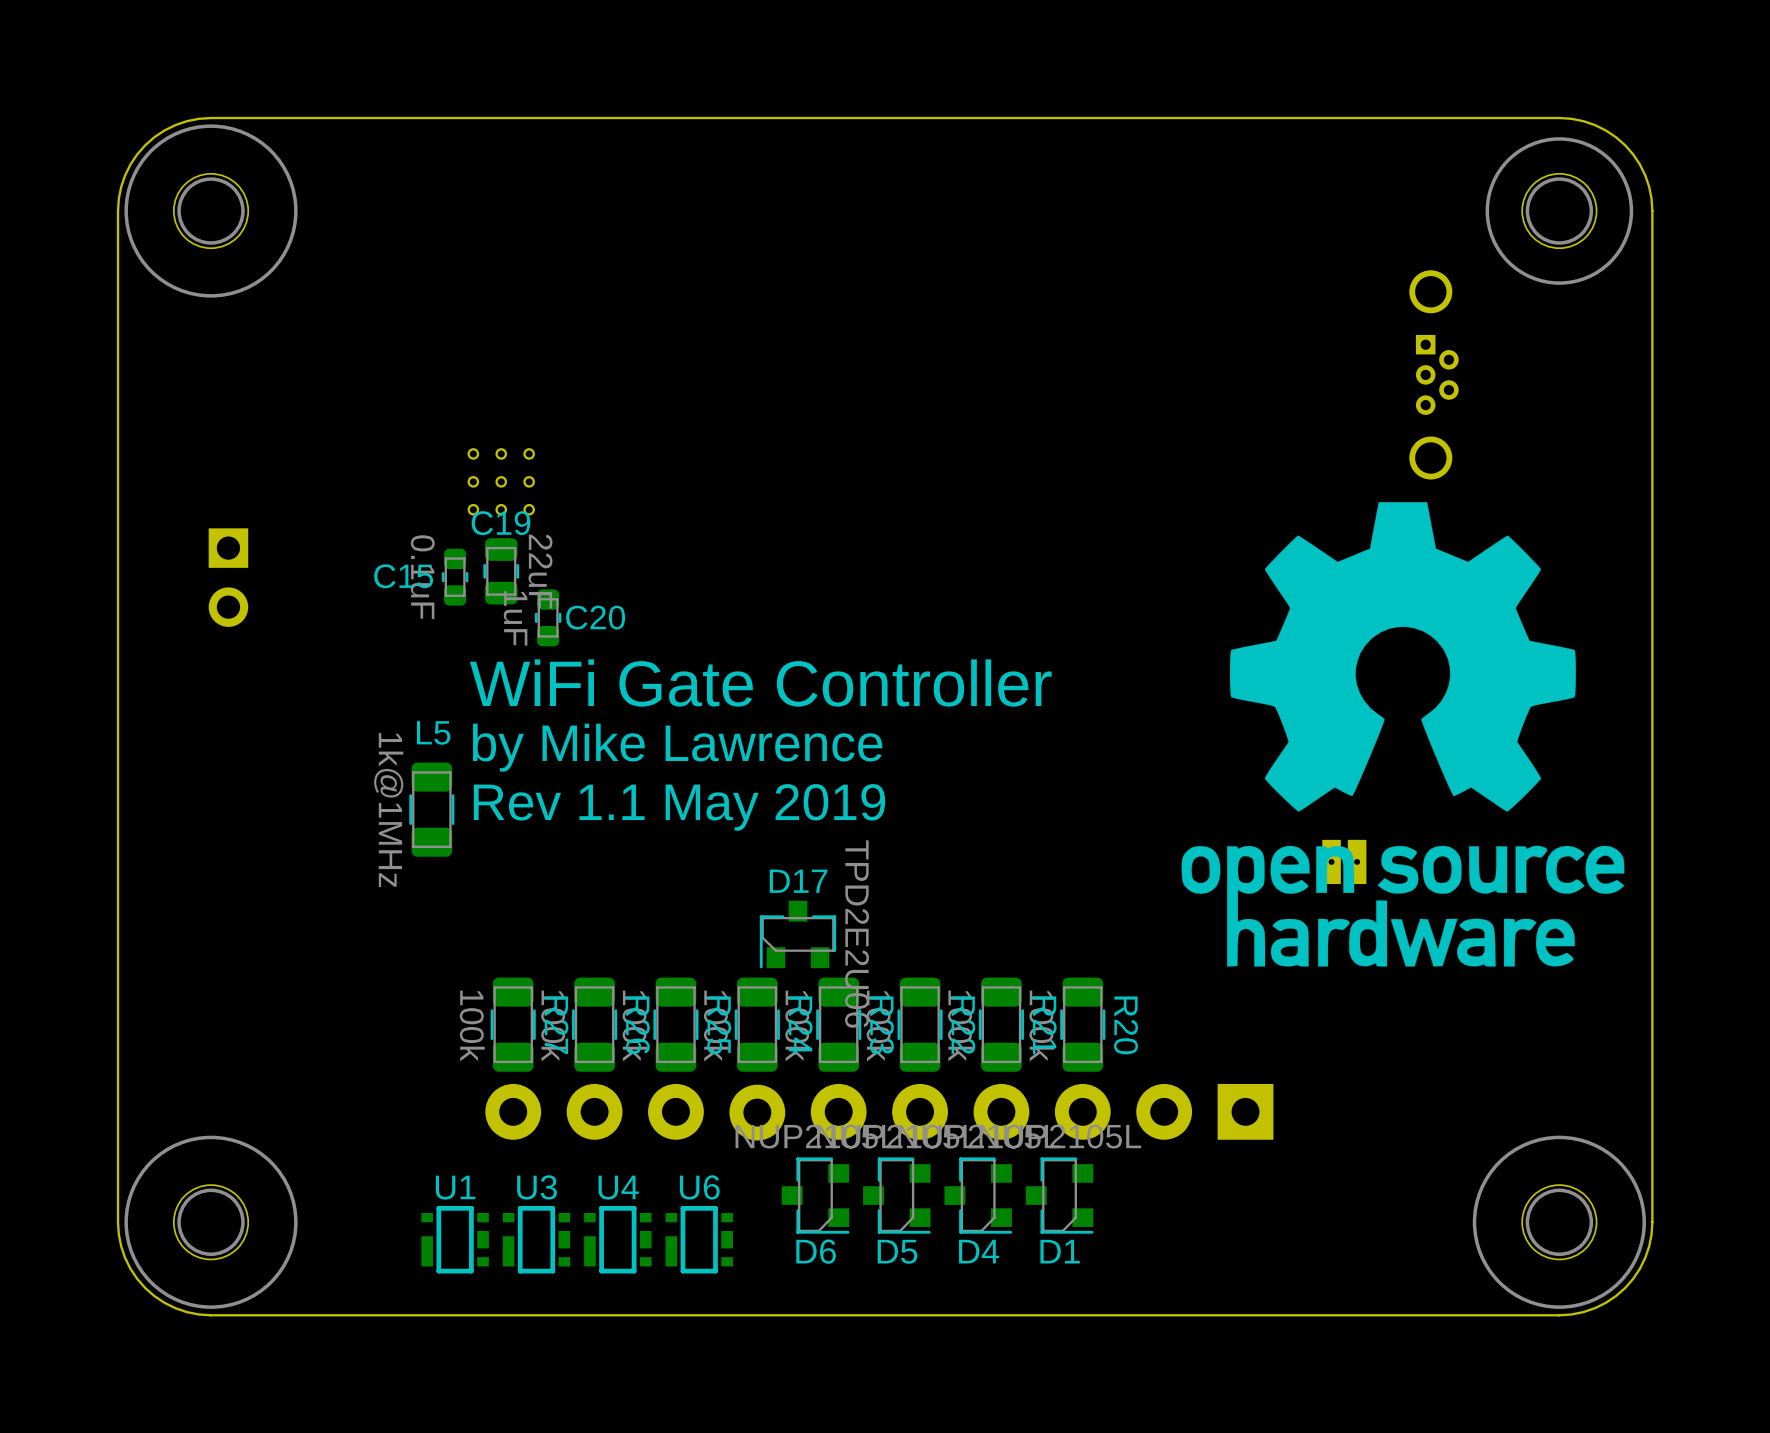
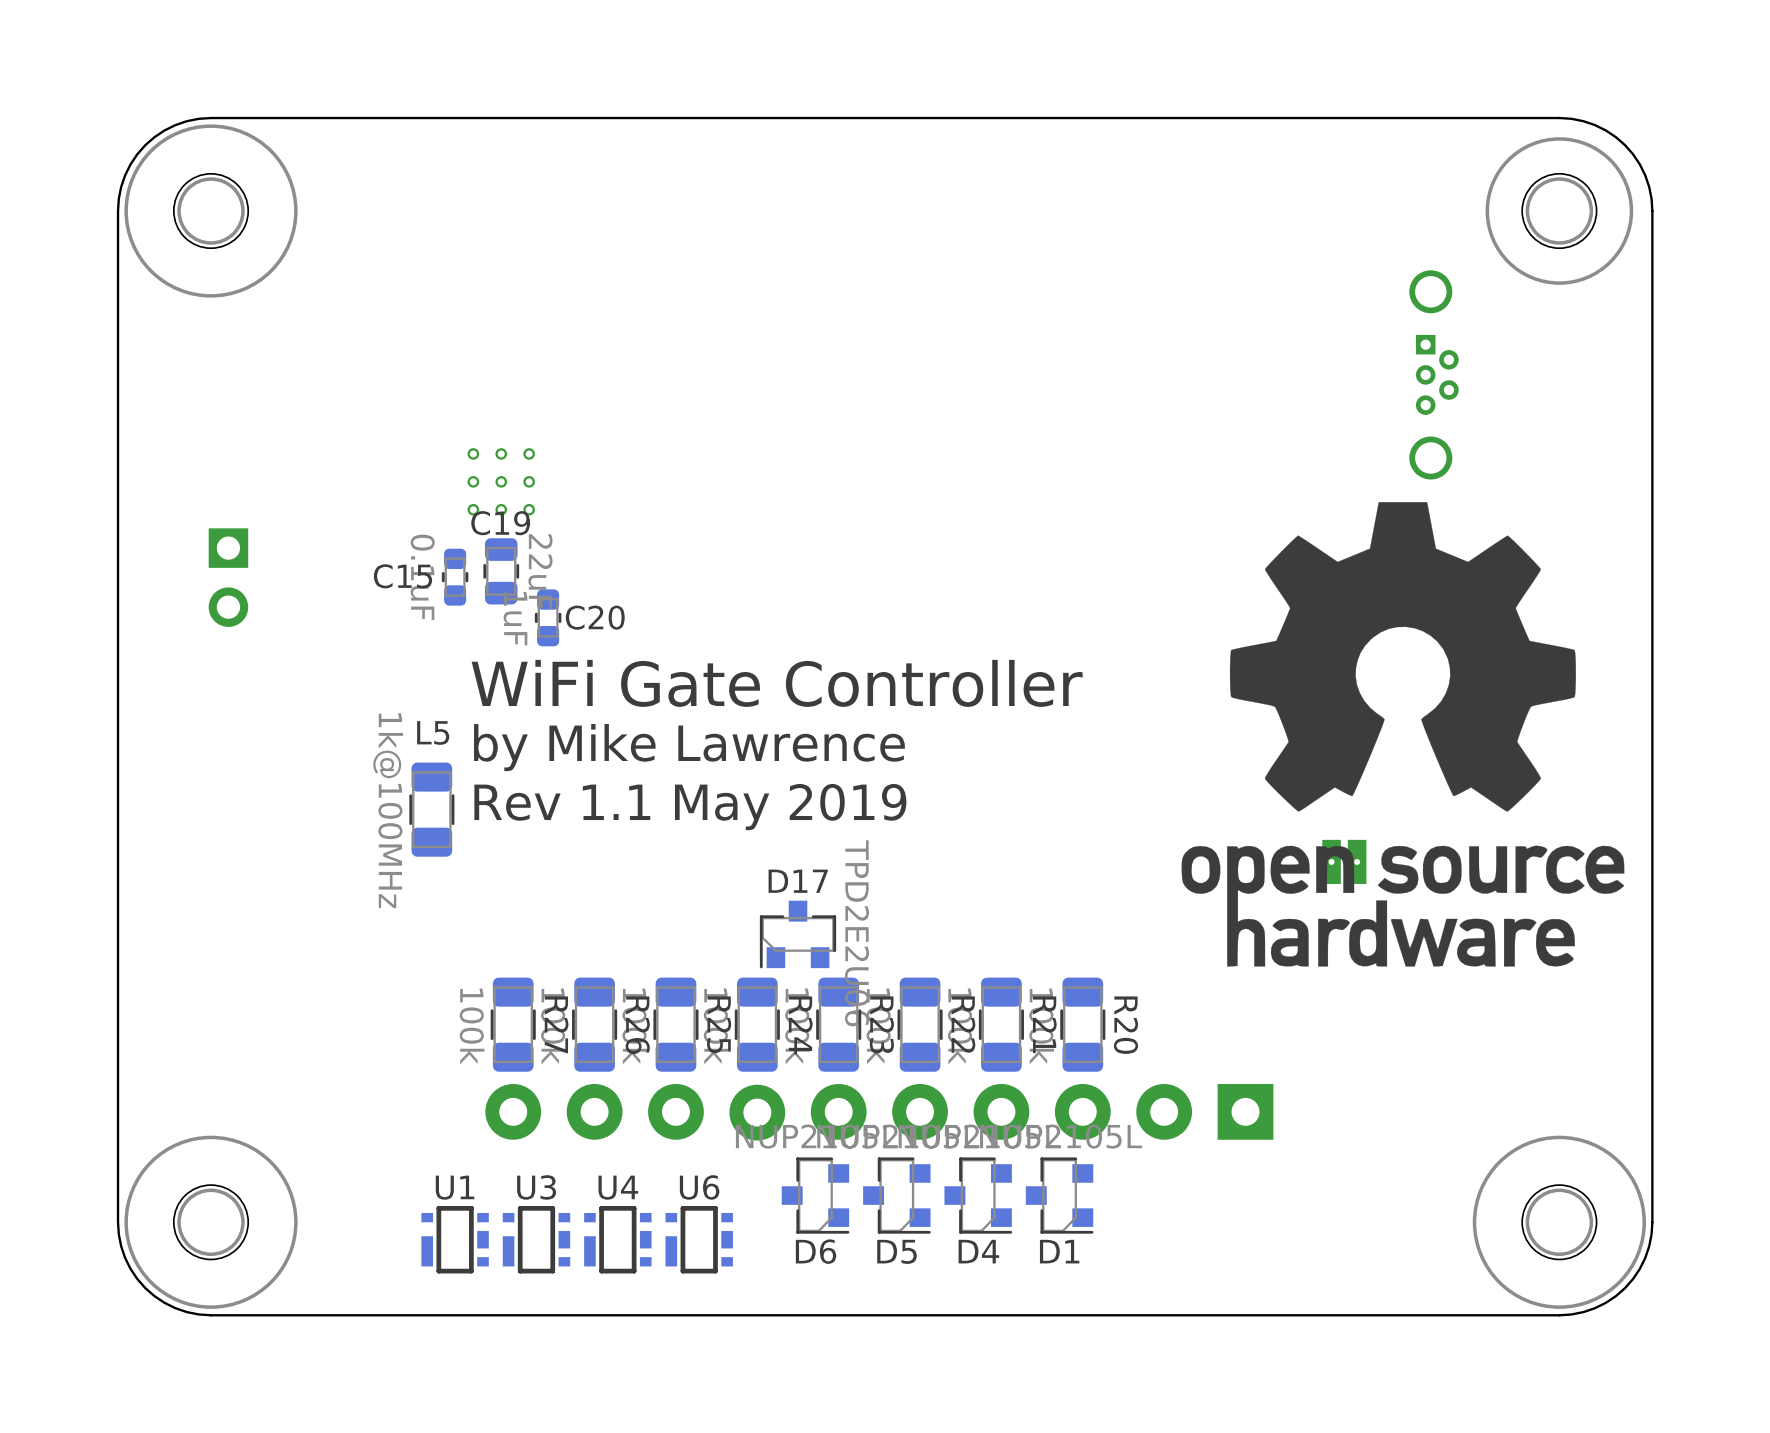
L5 value: 1k@1MHz (388, 810) -> 1k@100MHz (388, 810)

